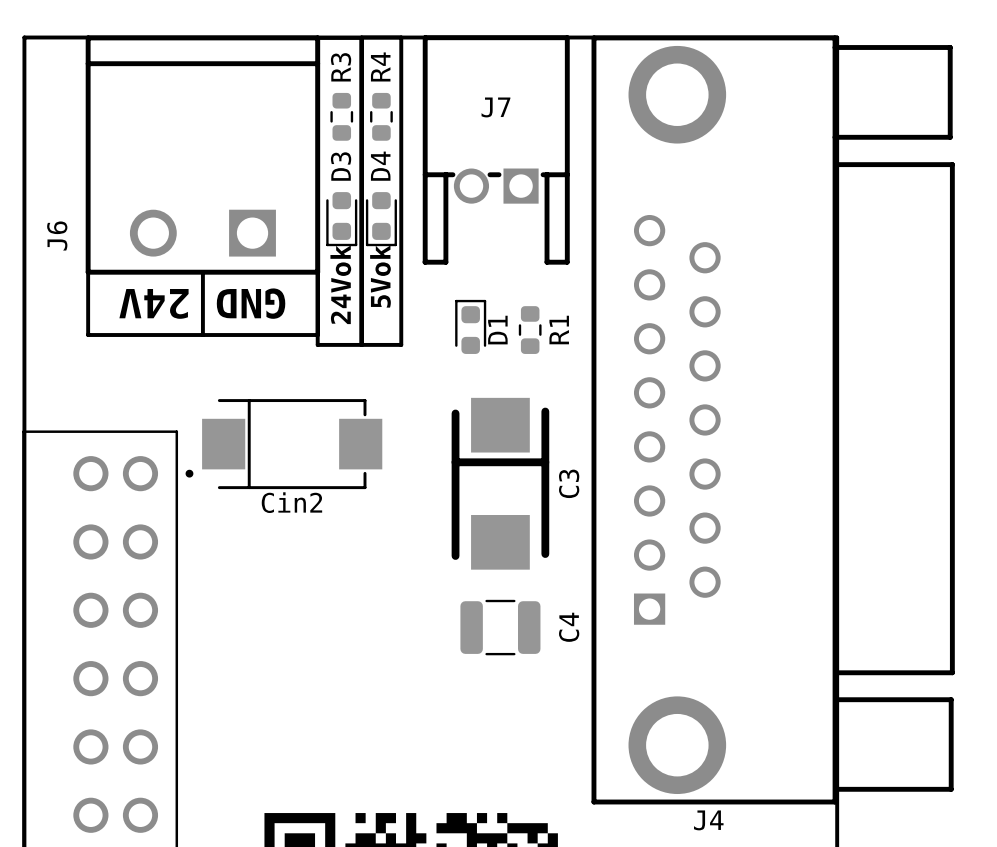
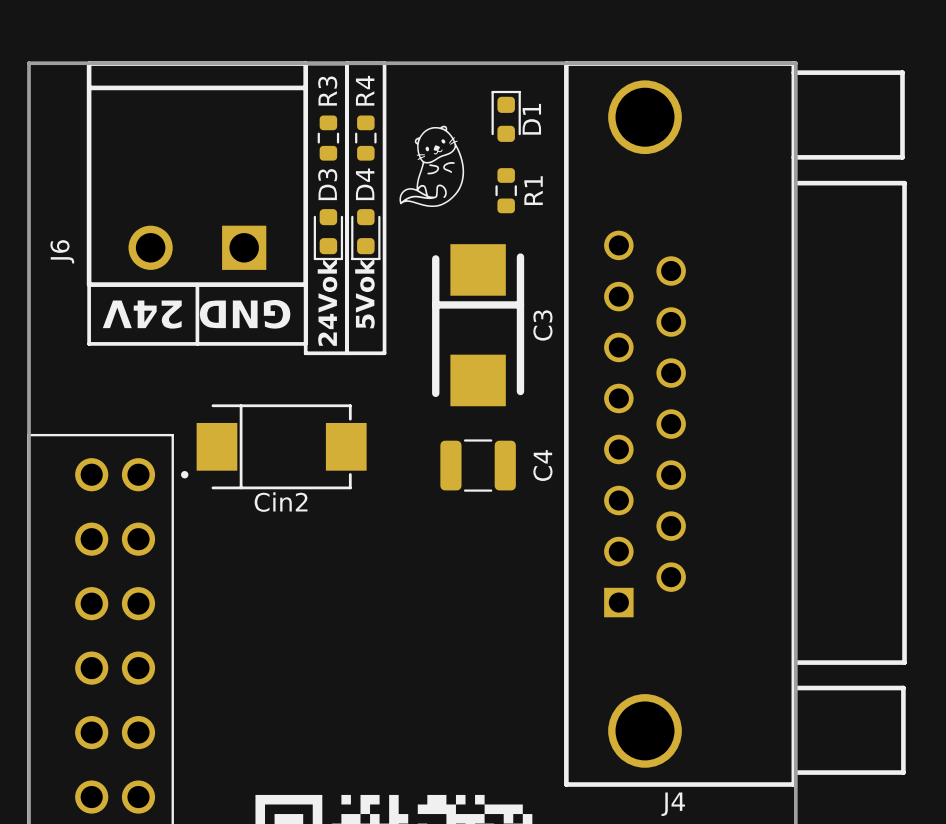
J4 footprint: [591, 35, 955, 805] -> [564, 61, 907, 787]
drawing: none -> [399, 125, 465, 207]
J7: (496, 149) -> none
D1 position: (470, 326) -> (506, 116)
R1 position: (530, 330) -> (506, 190)
C3 position: (500, 483) -> (478, 325)
C4 position: (500, 627) -> (478, 465)

